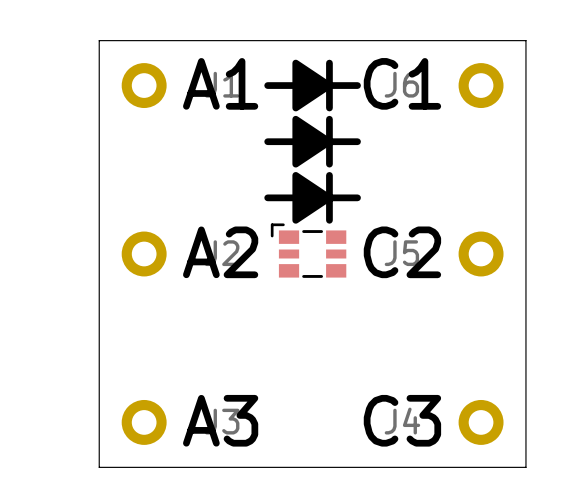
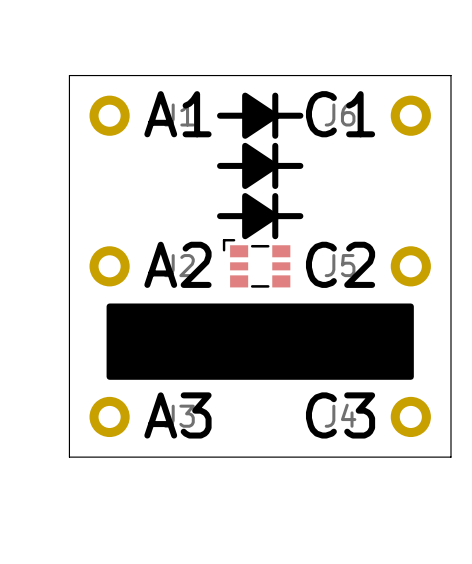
drawing: none -> [106, 303, 414, 380]

